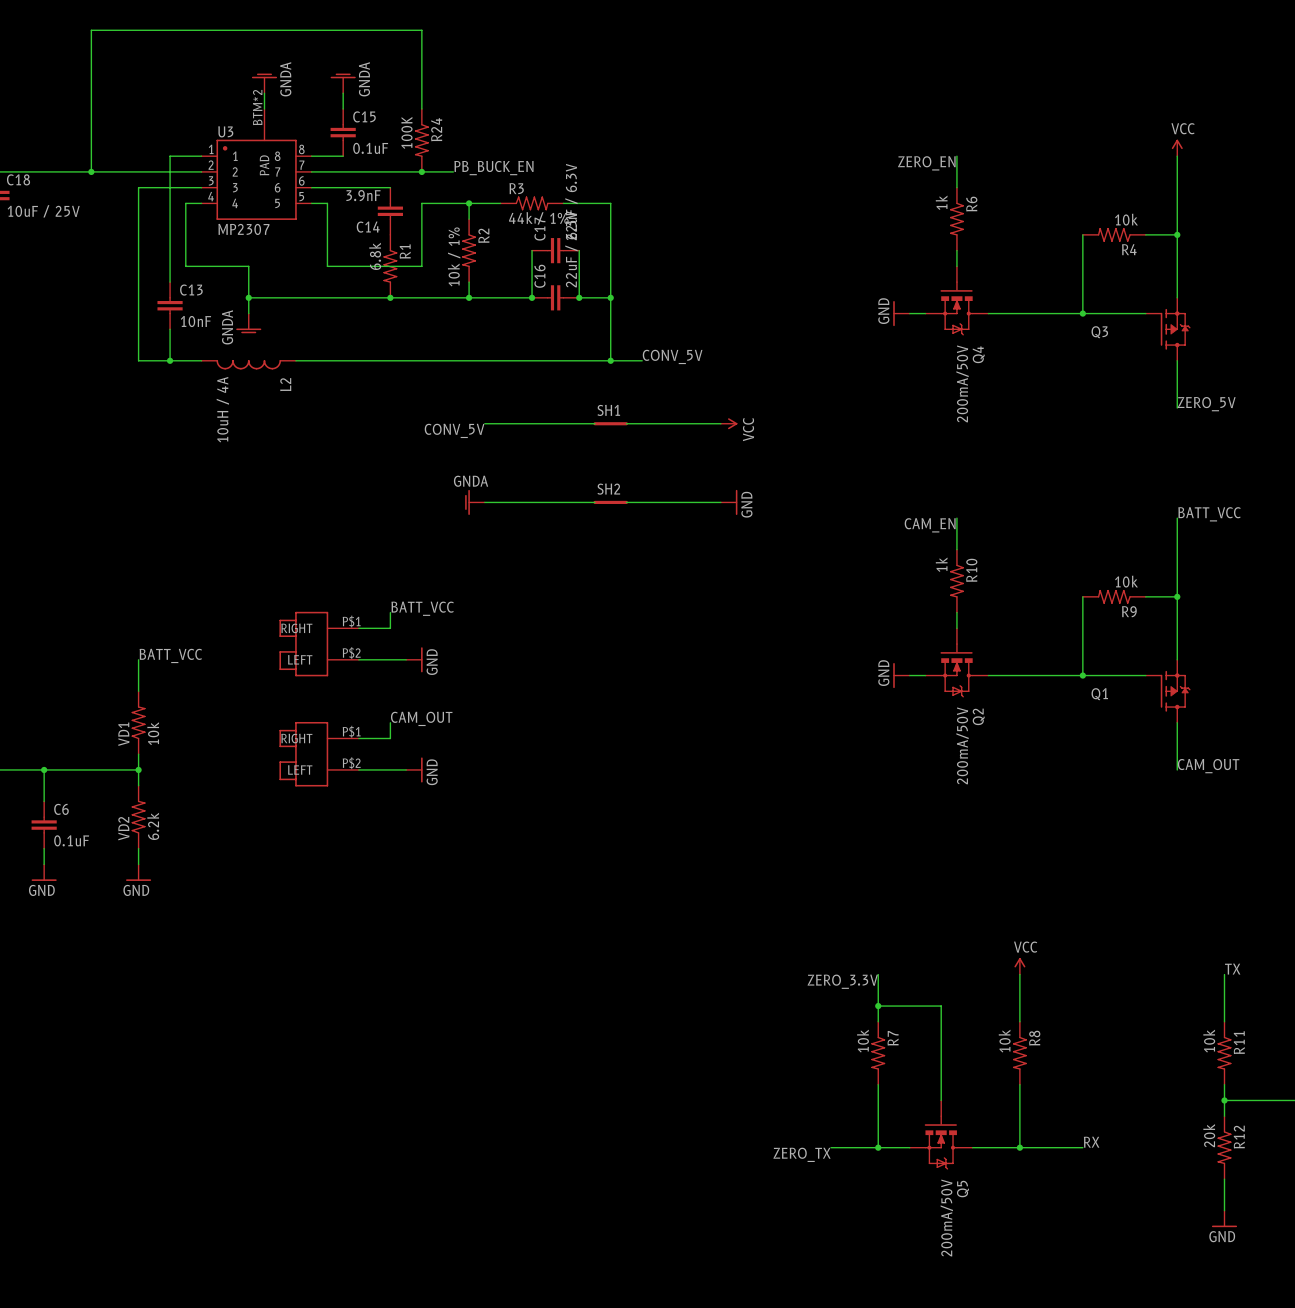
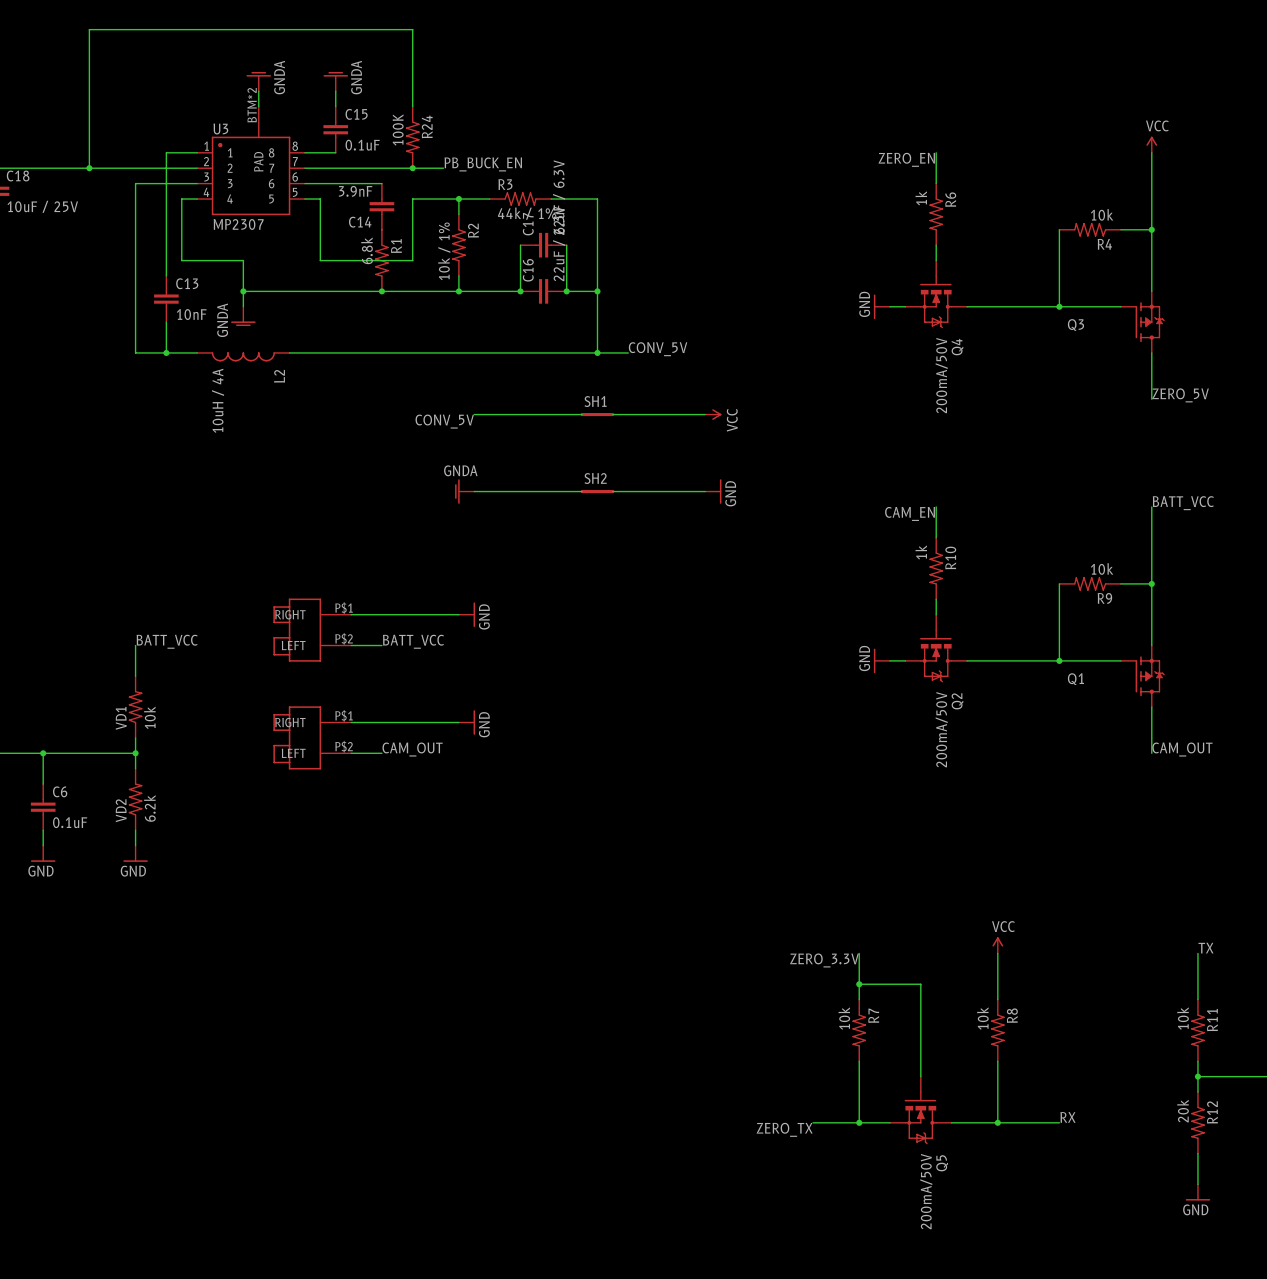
label position: BATT_VCC (422, 608) -> BATT_VCC (413, 641)
wire: (390, 612) (390, 628) -> (458, 614) (381, 614)
power symbol: none -> GND (467, 614)
wire: (390, 659) (406, 659) -> none
power symbol: GND (414, 659) -> none
label position: CAM_OUT (421, 718) -> CAM_OUT (412, 749)
wire: (390, 722) (390, 738) -> (458, 722) (381, 722)
power symbol: none -> GND (467, 722)
wire: (390, 769) (406, 769) -> none
power symbol: GND (414, 769) -> none

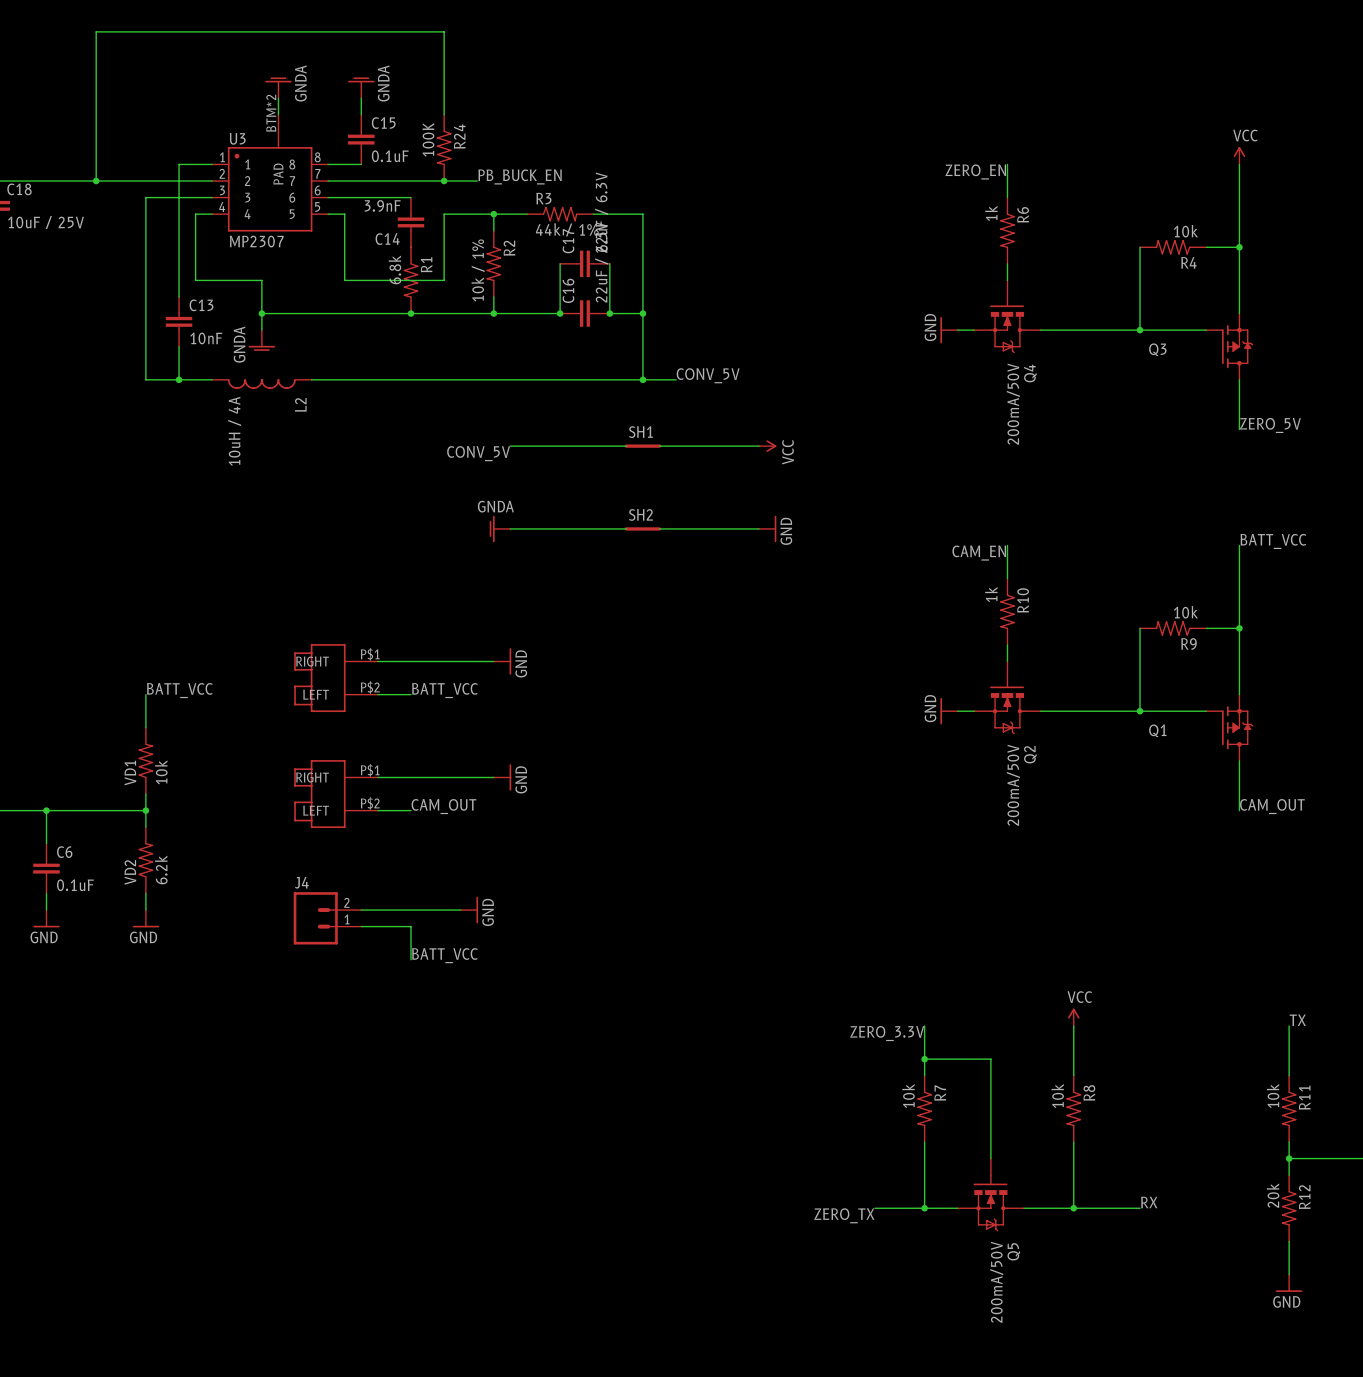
wire: none -> (361, 910) (460, 910)
power symbol: none -> GND (469, 910)
J4: none -> (327, 918)
wire: none -> (361, 926) (410, 926) (410, 959)
label: none -> BATT_VCC (444, 955)

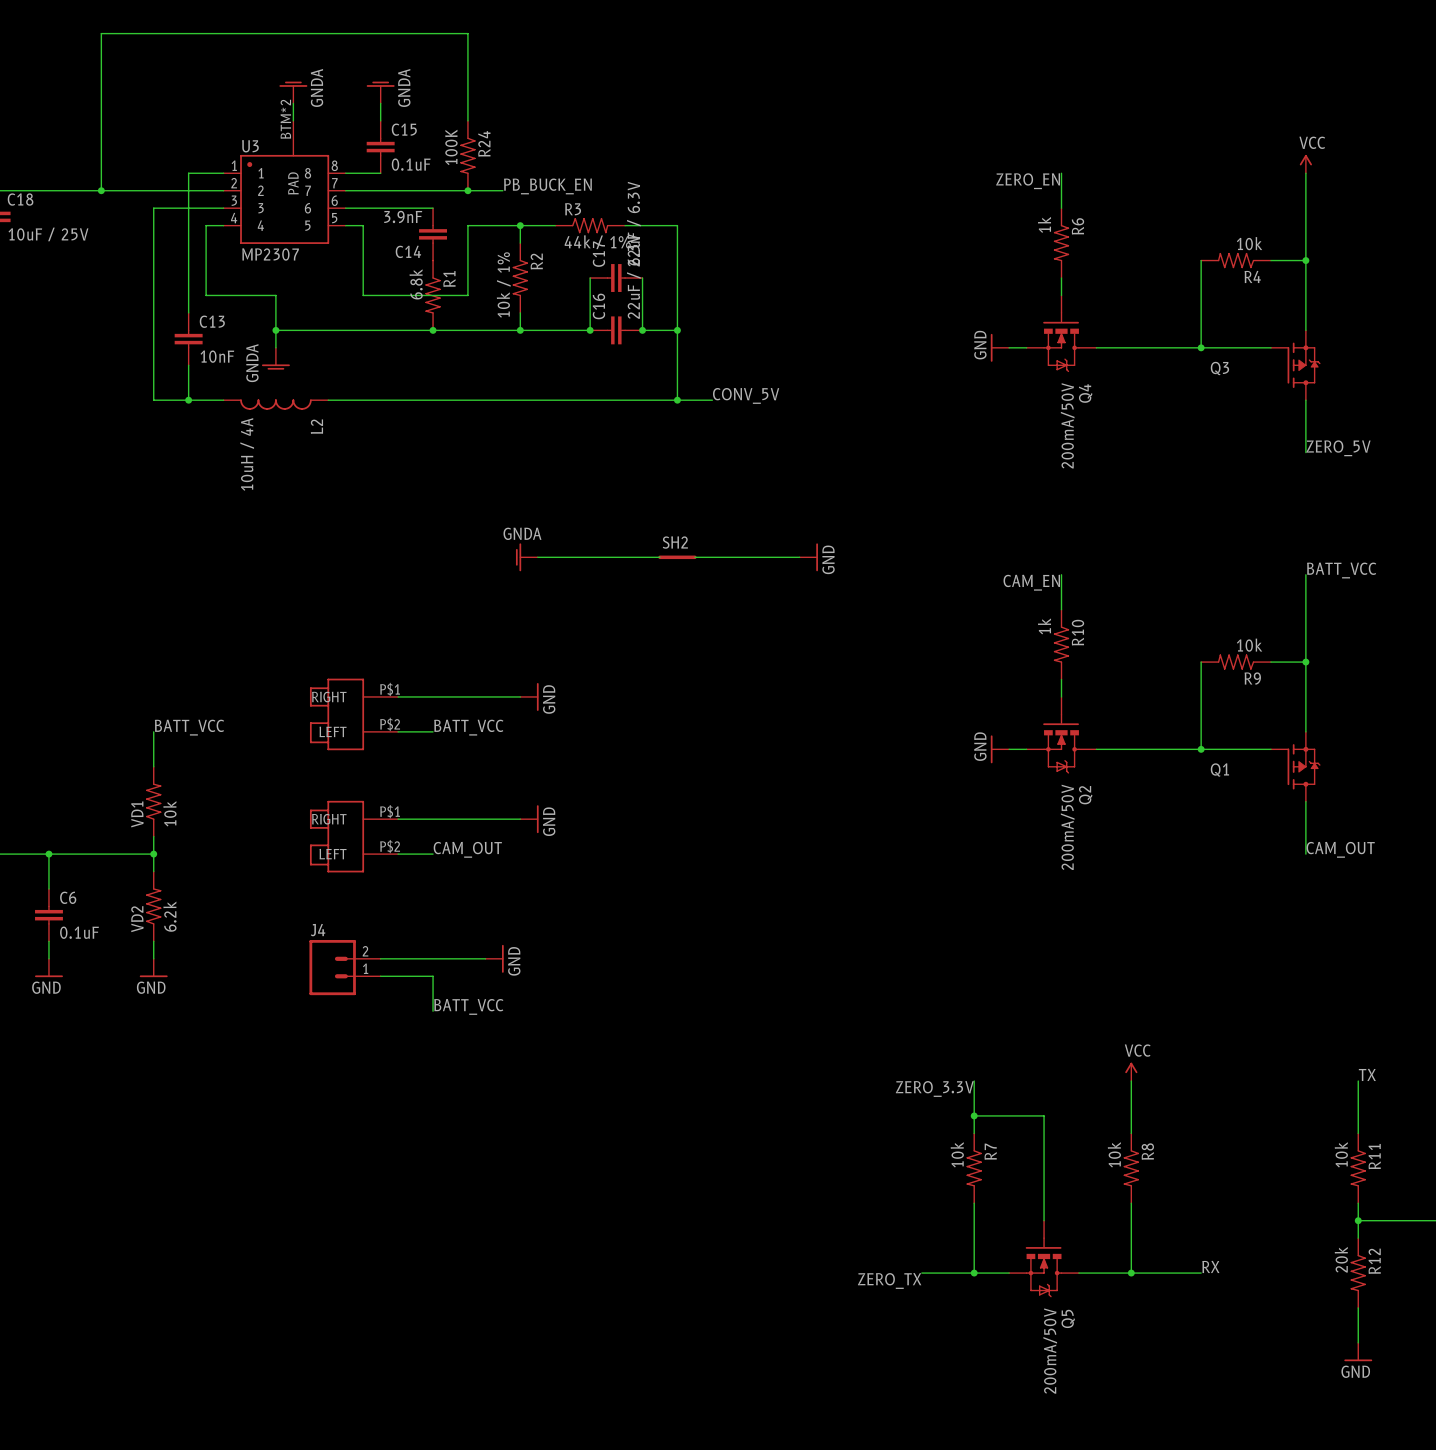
wire: (510, 446) (626, 446) -> none
SH1: (642, 446) -> none
wire: (659, 446) (758, 446) -> none
power symbol: VCC (767, 446) -> none
label: CONV_5V (478, 453) -> none

